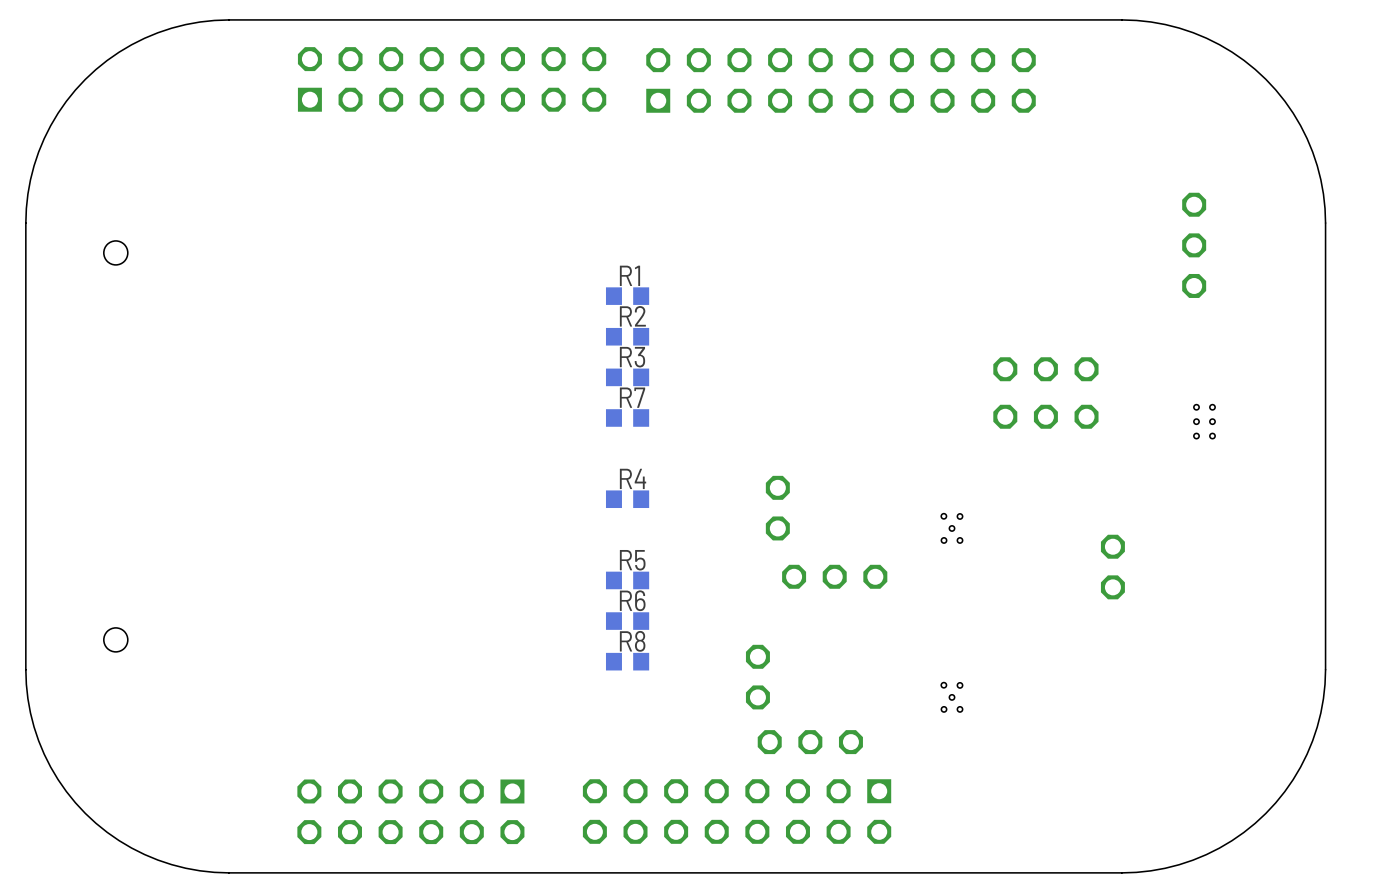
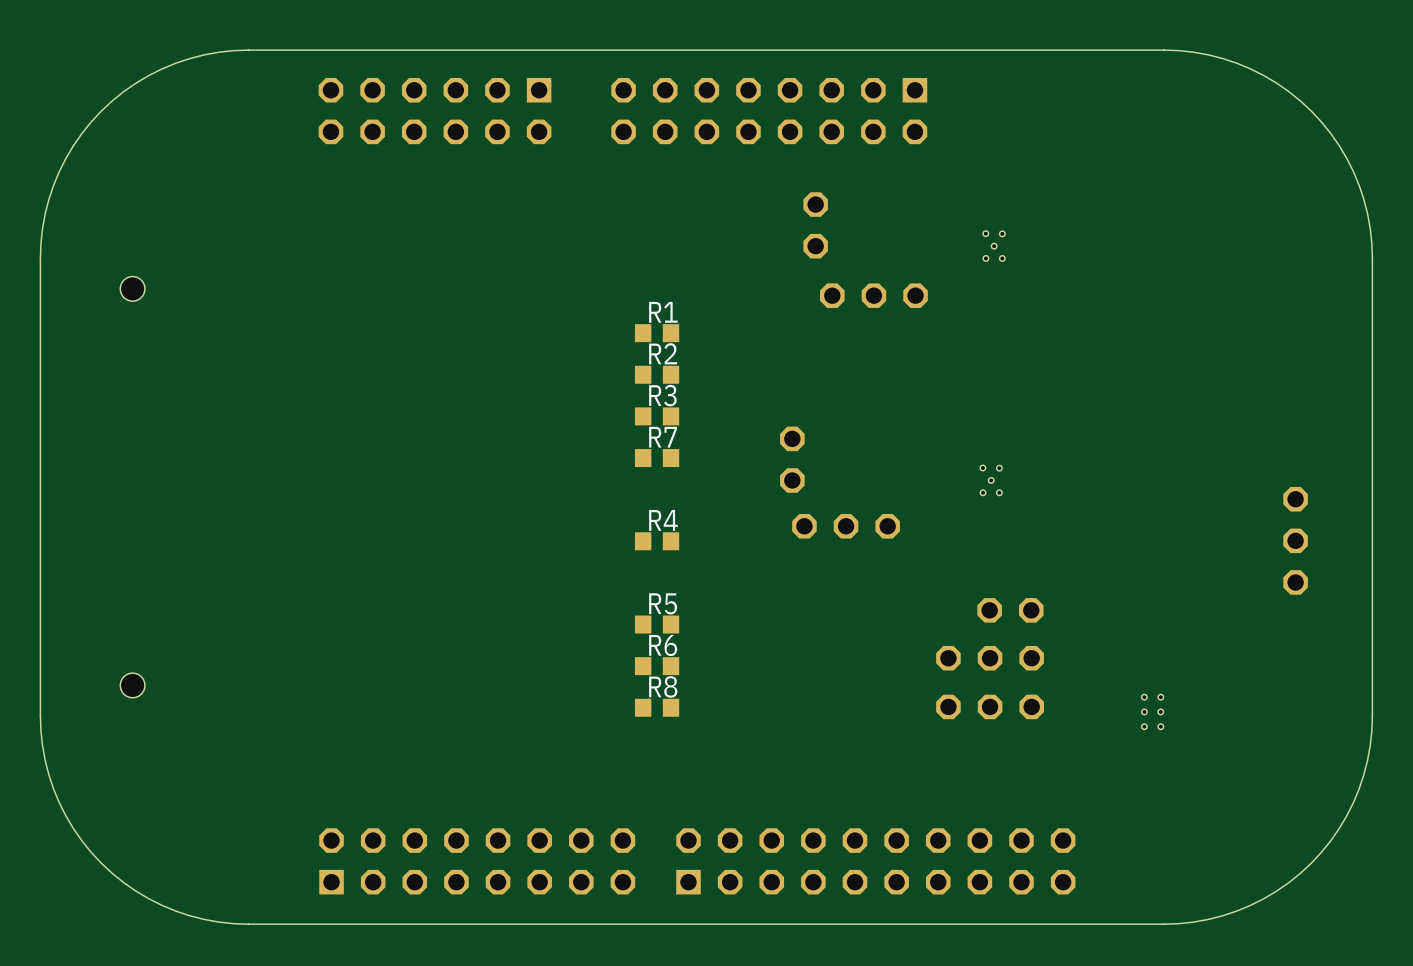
part: none -> (435, 111)
part rotation: 0° (452, 79) -> 180° (769, 111)
part position: (452, 79) -> (769, 111)
part: (841, 80) -> none
part: none -> (815, 225)
part: none -> (994, 246)
part: (1194, 245) -> none
part: none -> (873, 295)
part: (1045, 369) -> none
part: (1045, 416) -> none
part position: (1204, 421) -> (1152, 711)
part: none -> (846, 526)
part: none -> (1295, 540)
part position: (777, 508) -> (792, 459)
part position: (951, 528) -> (991, 480)
part: none -> (1010, 610)
part: (1112, 567) -> none
part: (834, 576) -> none
part: none -> (990, 658)
part: none -> (990, 706)
part: (757, 677) -> none
part: (951, 697) -> none
part: (810, 742) -> none
part: (410, 811) -> none
part rotation: 0° (737, 811) -> 180° (477, 861)
part position: (737, 811) -> (477, 861)
part: none -> (875, 861)

